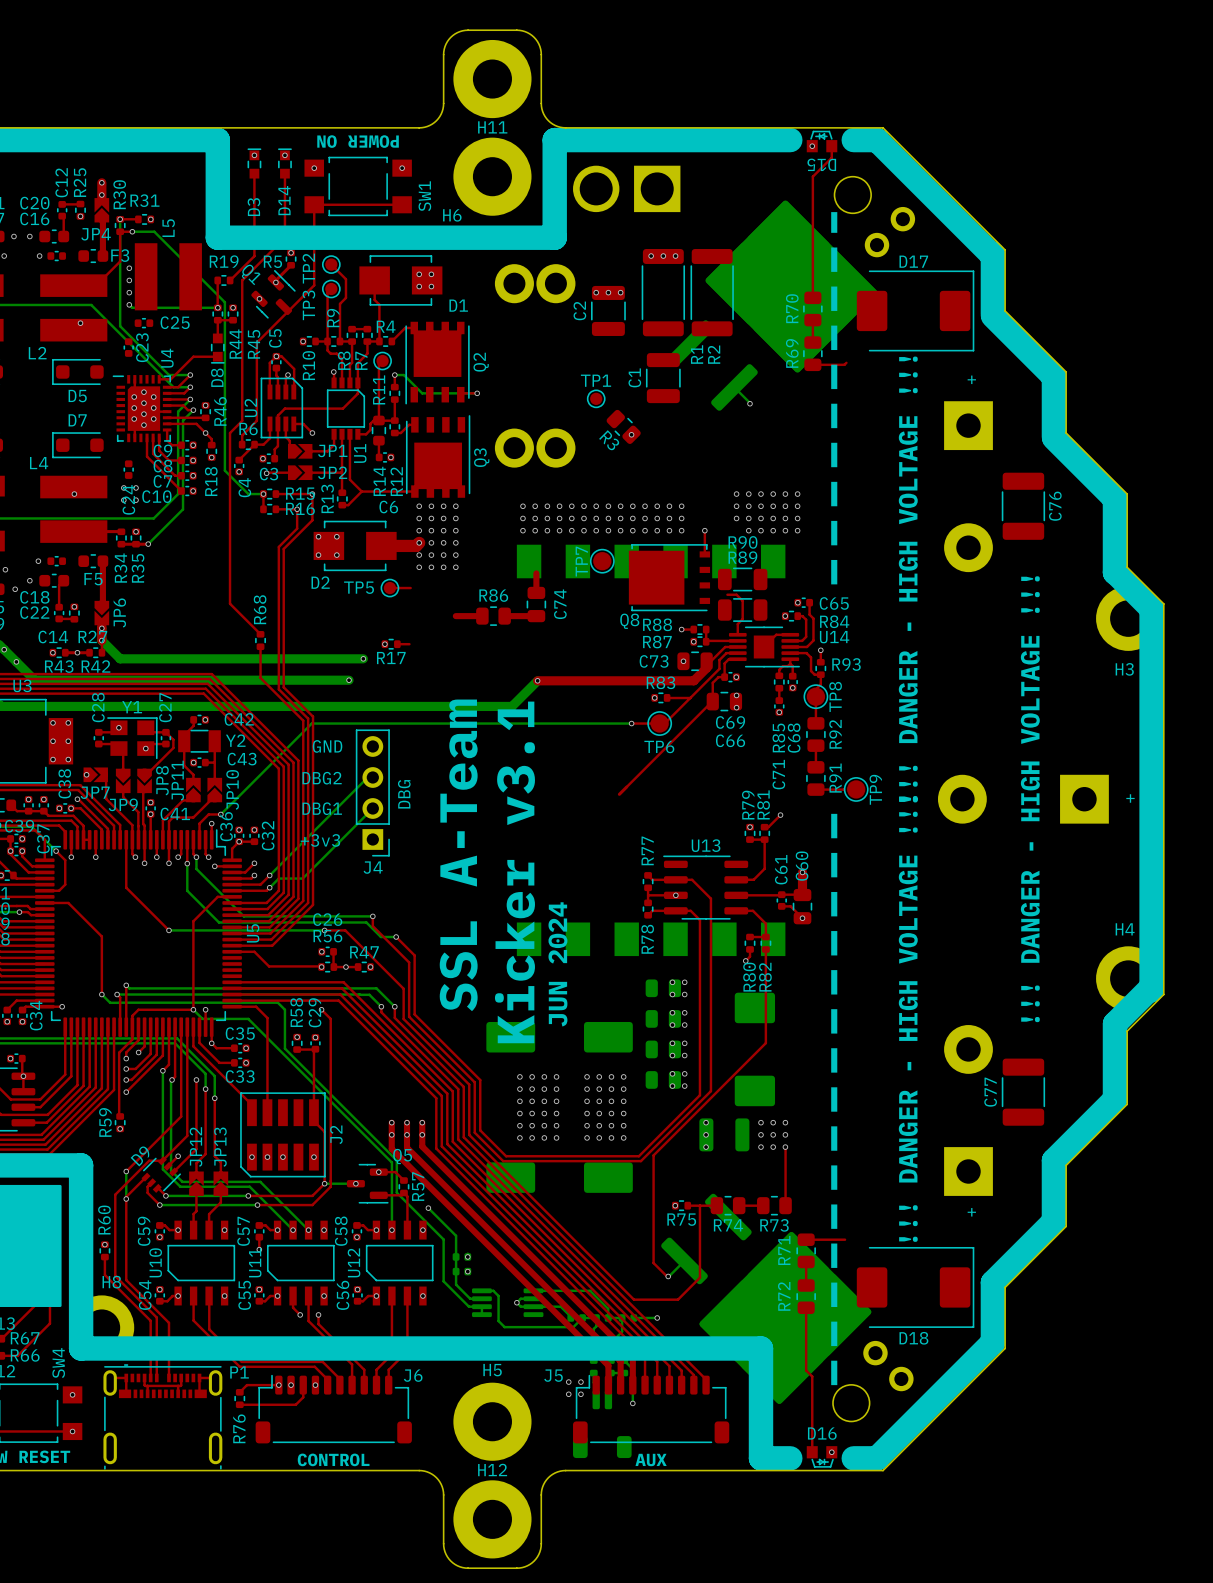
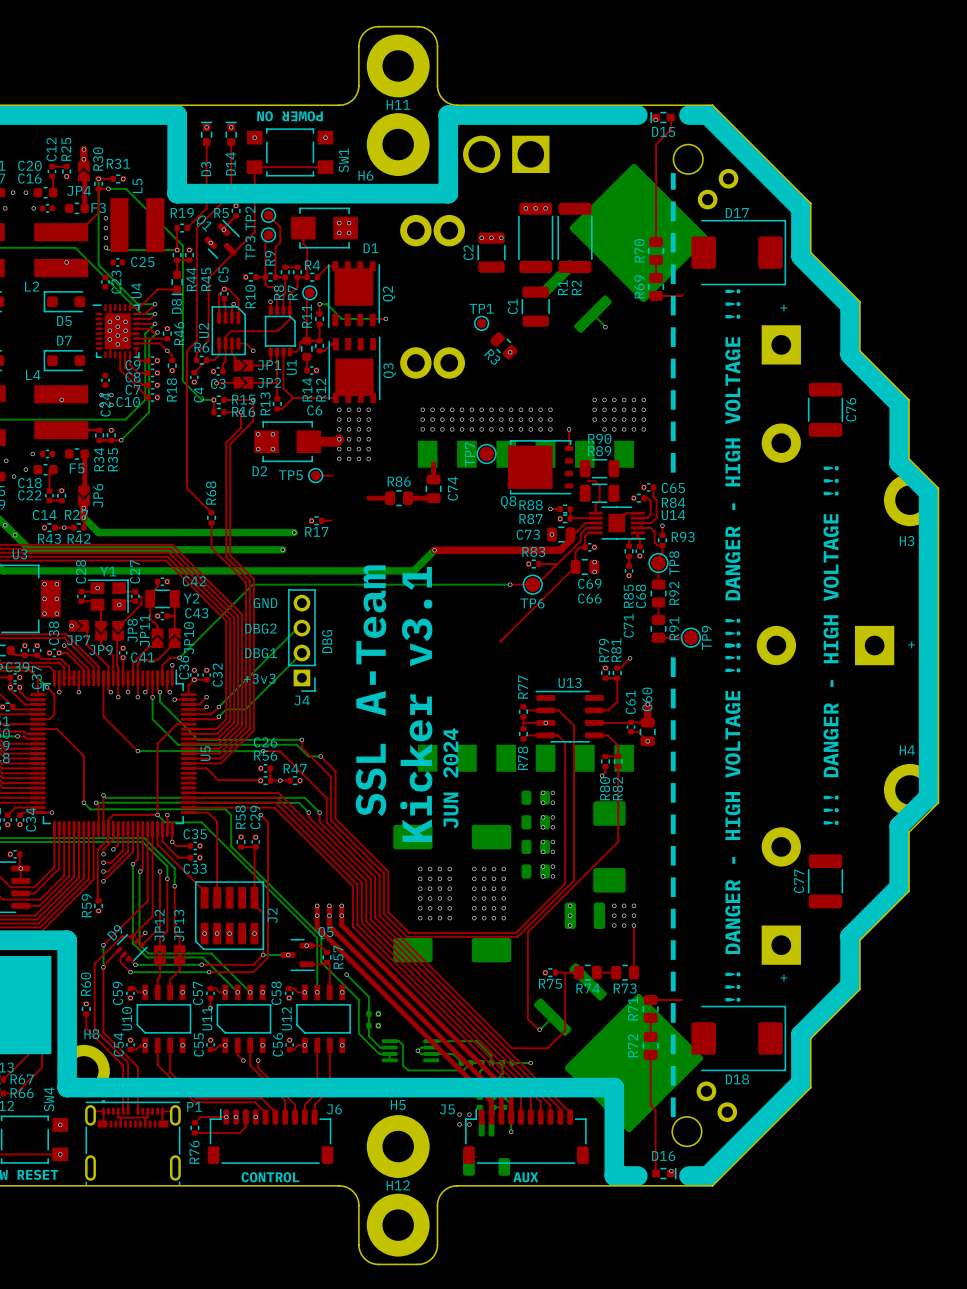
D15 footprint: [806, 130, 838, 153] -> [650, 112, 675, 124]
D15 name rotation: 0° (821, 164) -> 180° (663, 131)
D16 footprint: [806, 1446, 838, 1468] -> [652, 1168, 677, 1180]

